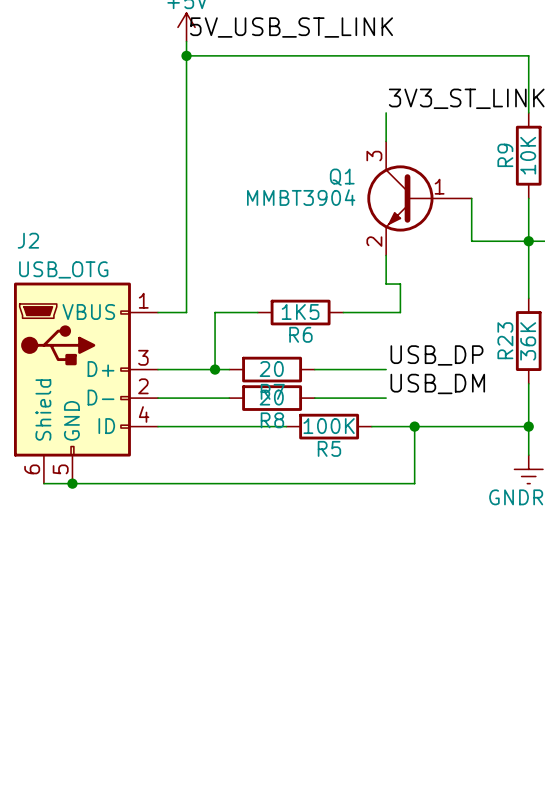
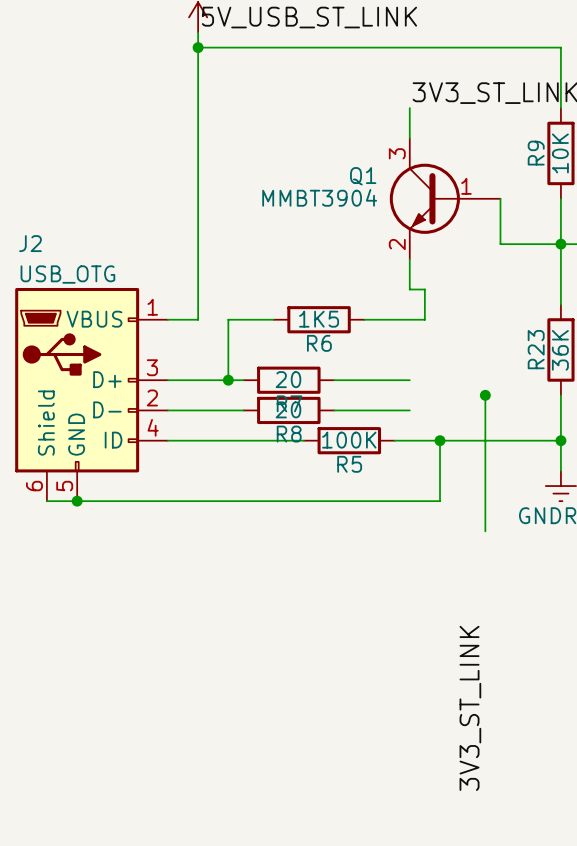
label: USB_DP (436, 355) -> none
label: USB_DM (437, 383) -> none
wire: none -> (485, 395) (485, 531)
junction: none -> (485, 395)
label: none -> 3V3_ST_LINK (470, 708)

